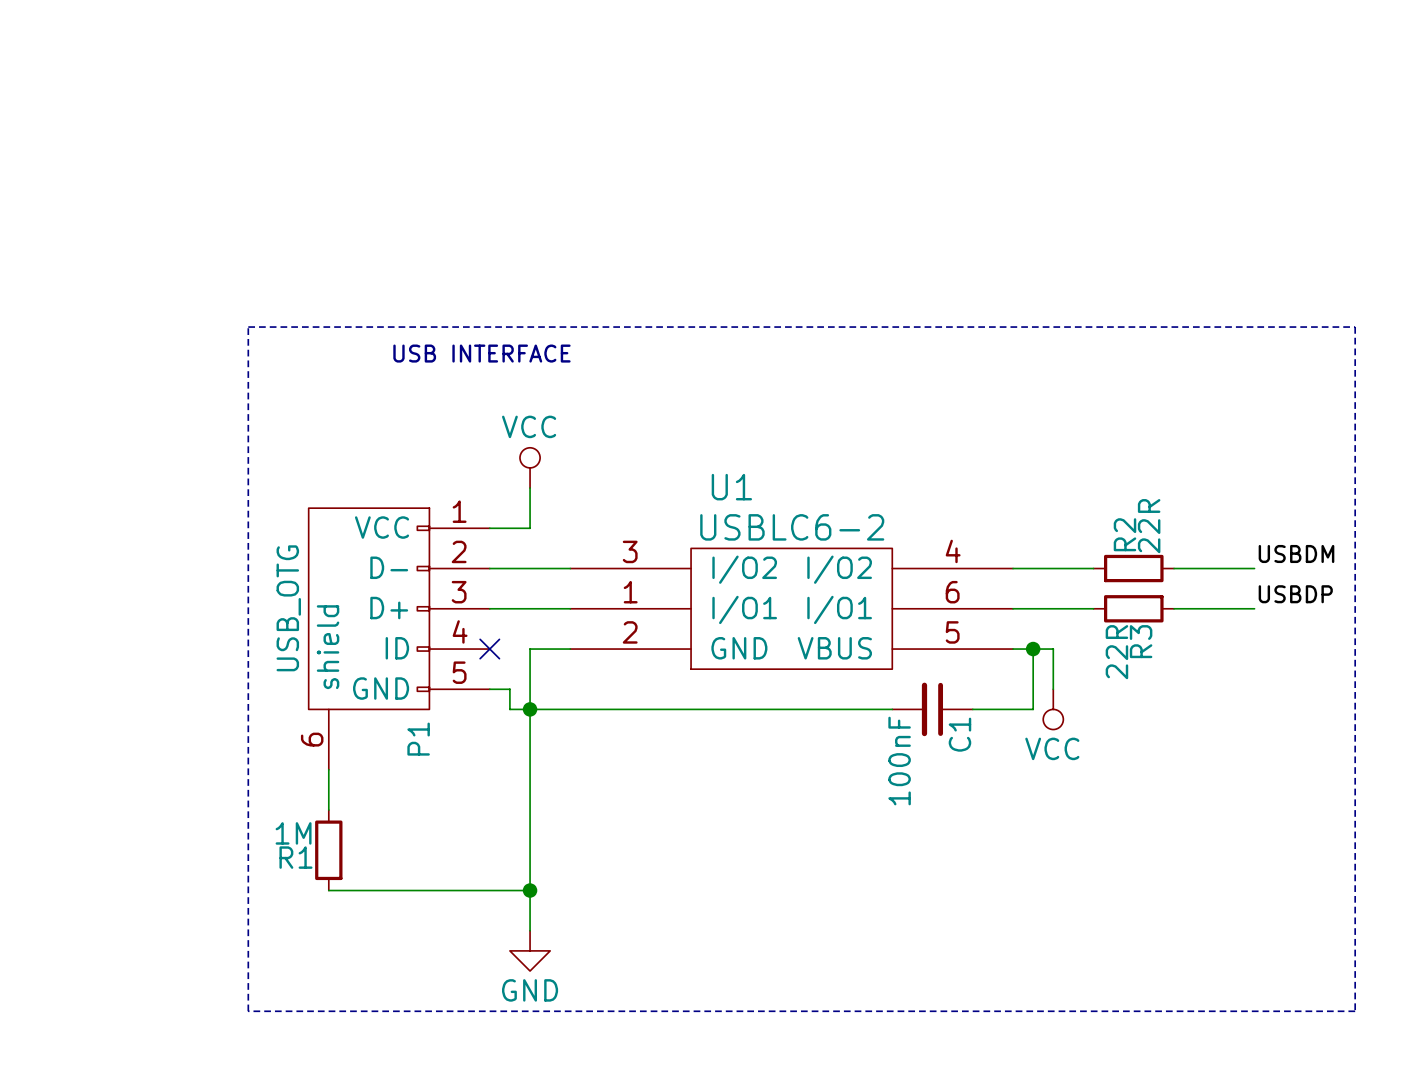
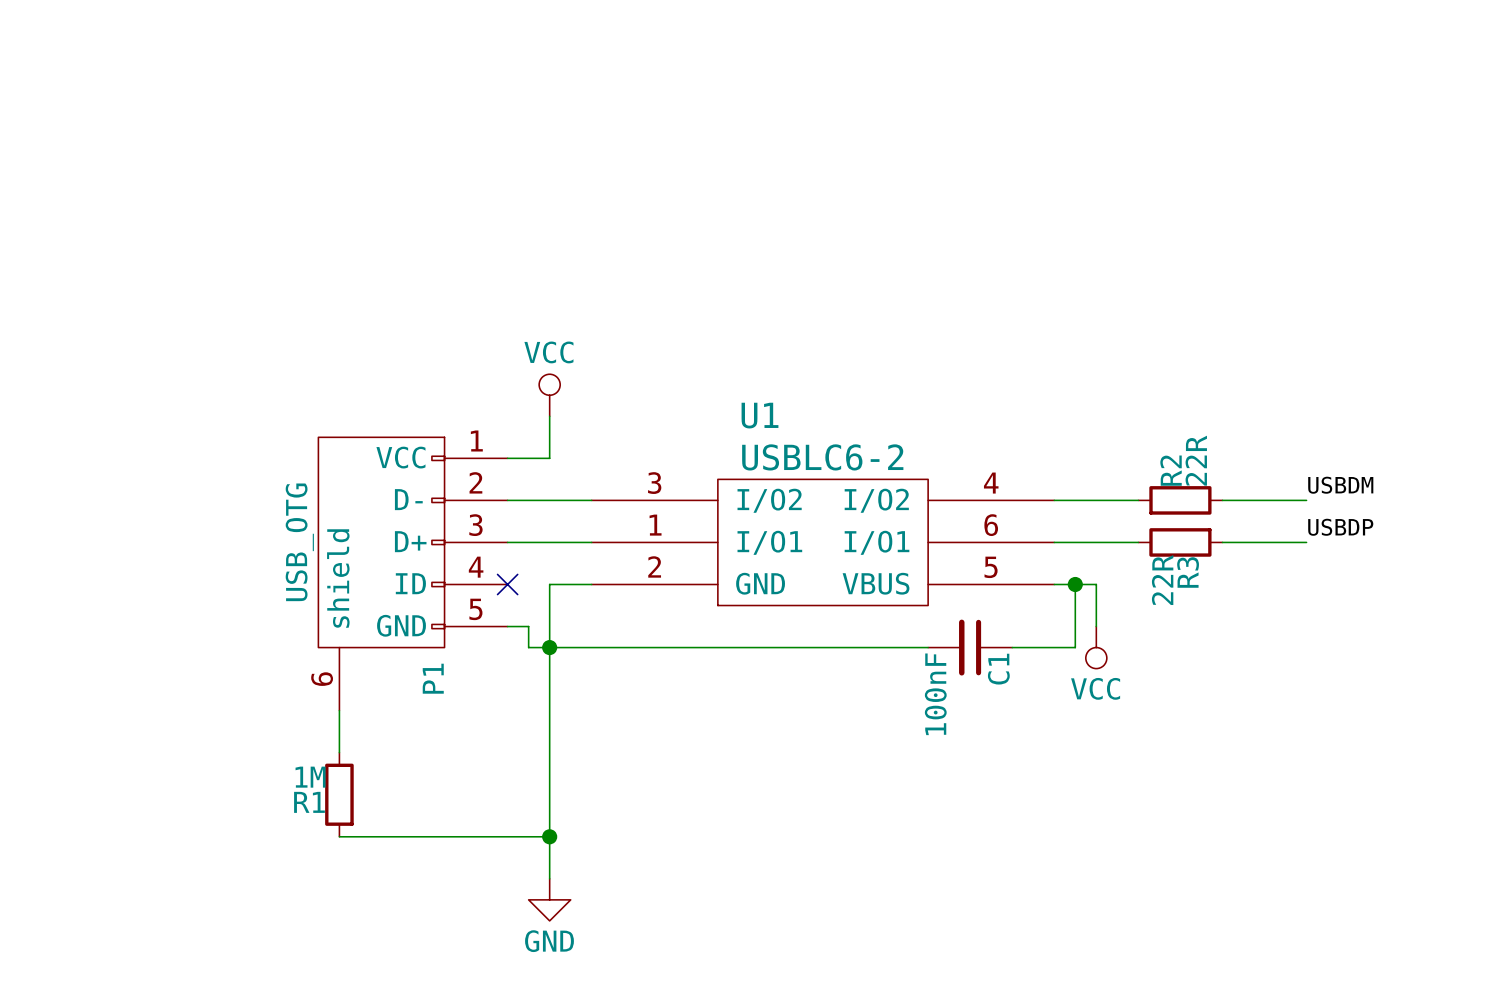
line: (248, 327) (1355, 327) (1355, 1011) (248, 1011) (248, 327) -> none
text: USB INTERFACE (481, 353) -> none

